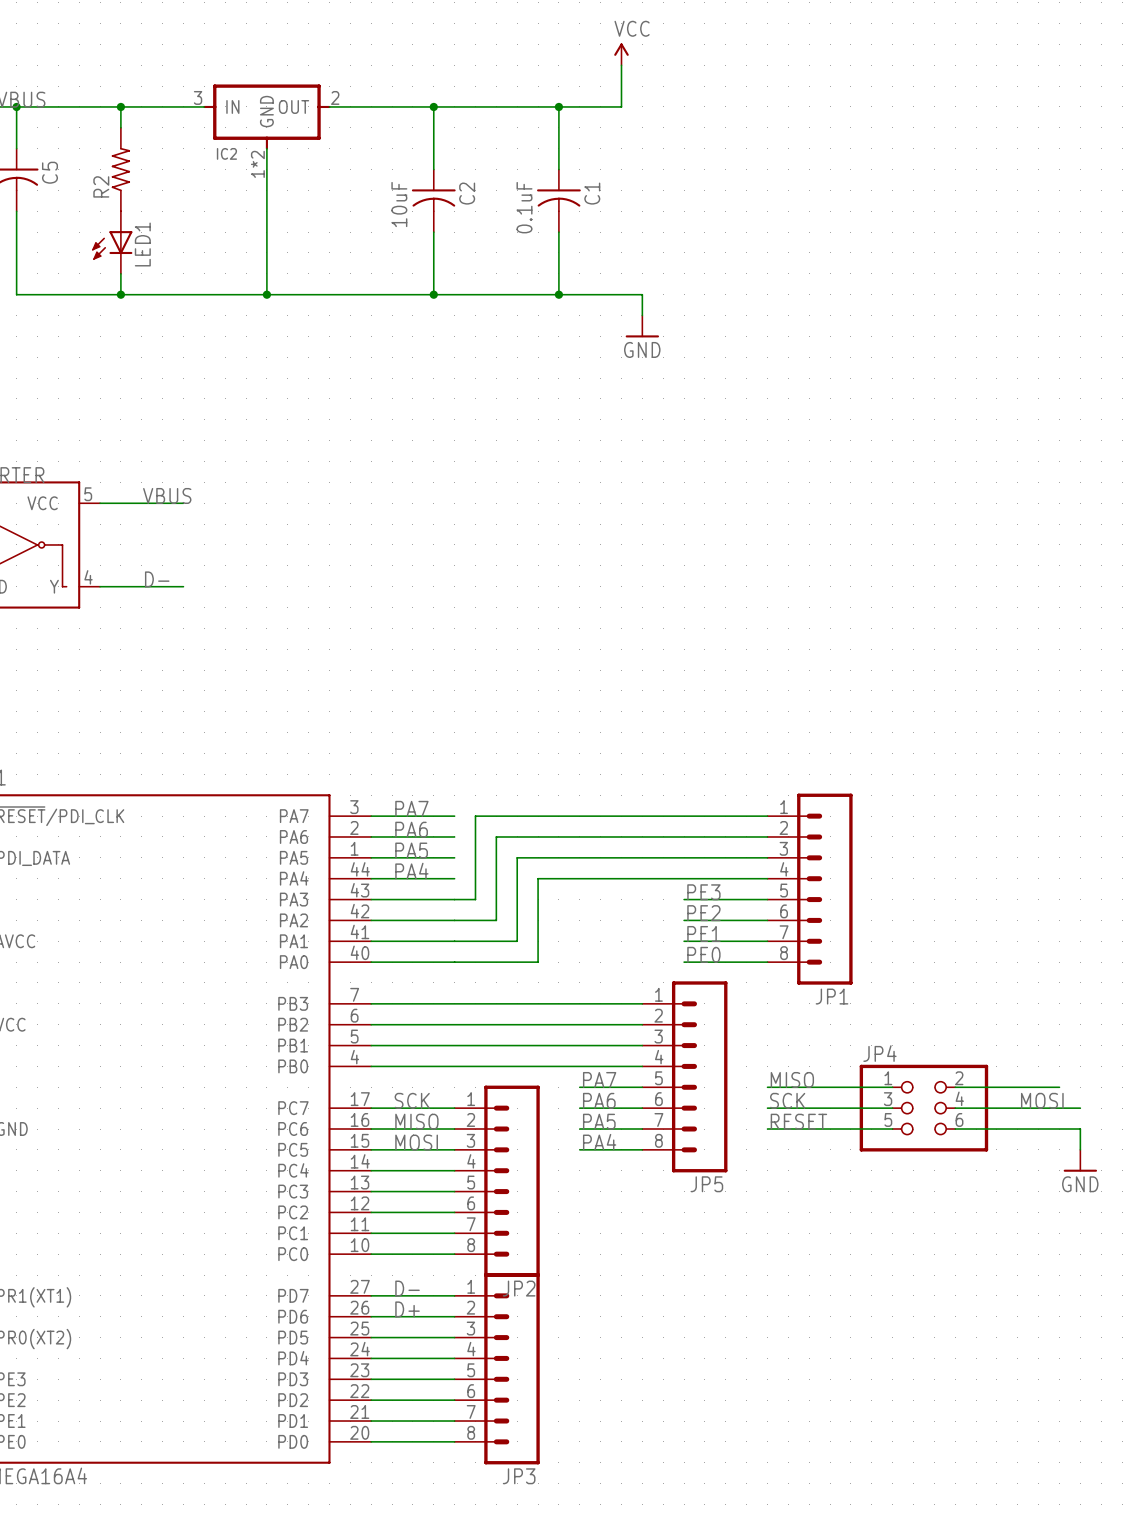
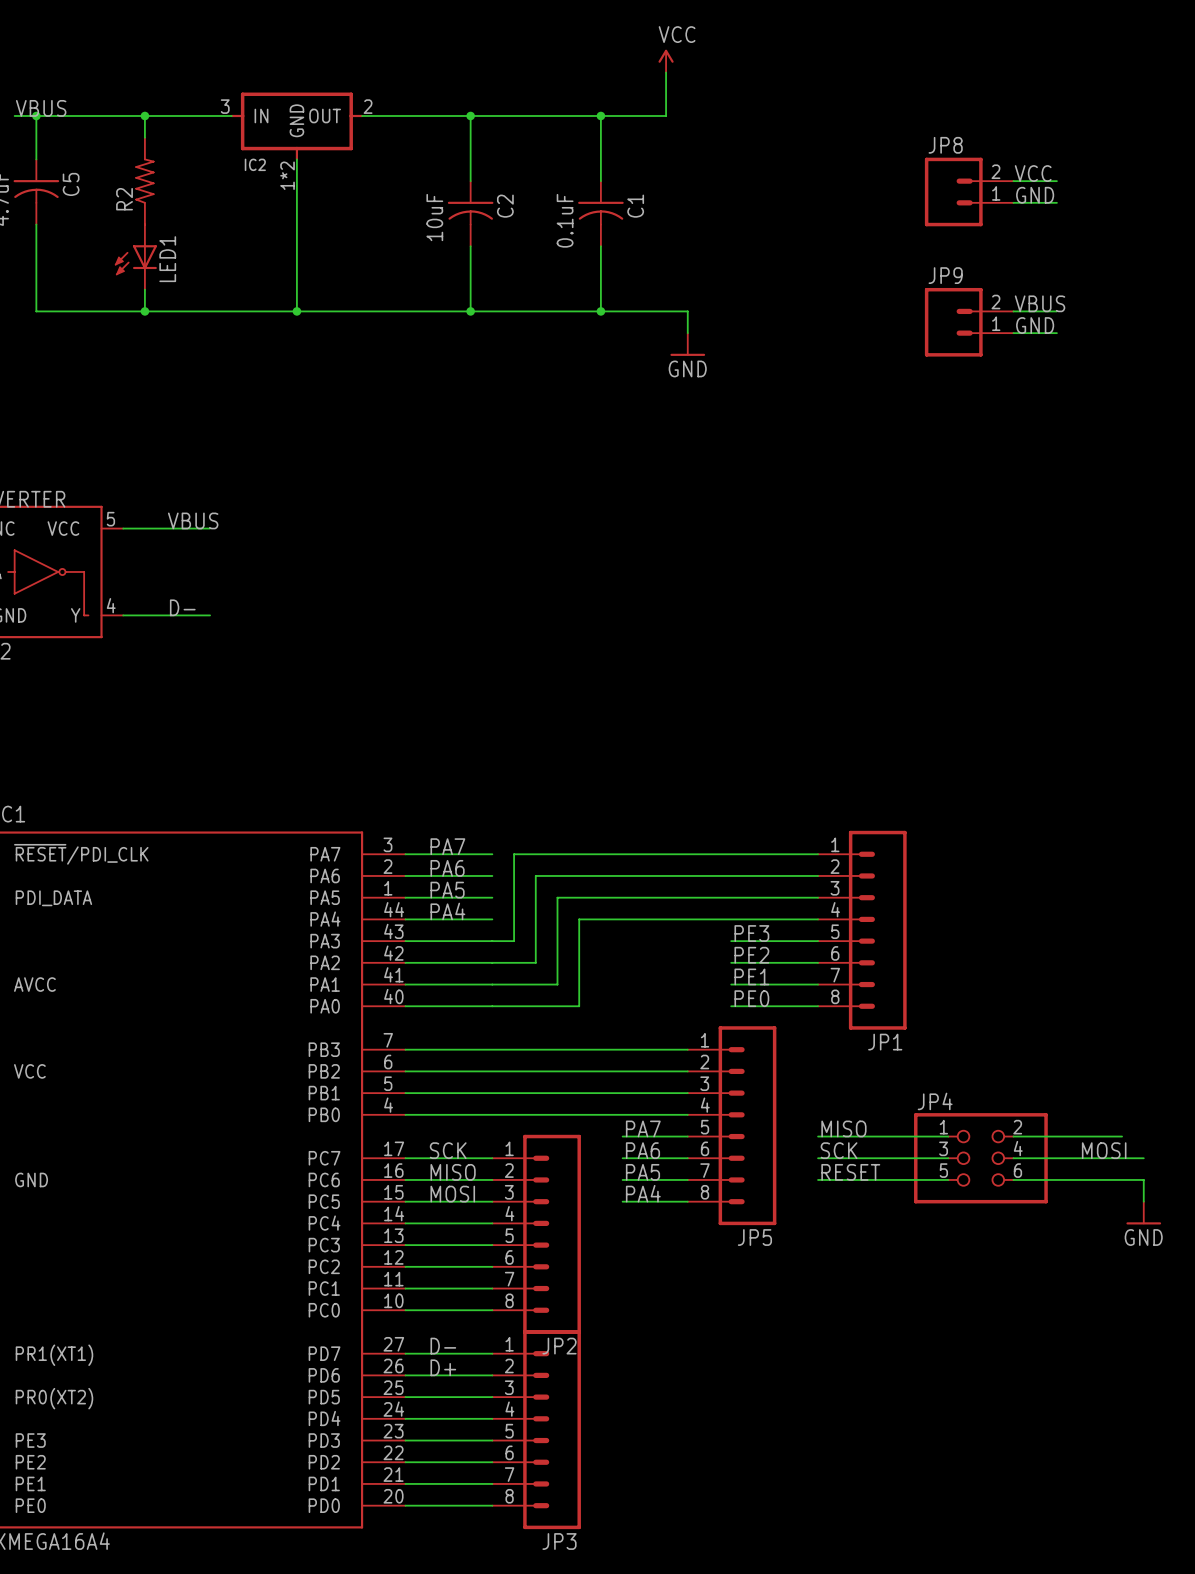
label: none -> VCC (1033, 173)
wire: none -> (1013, 181) (1056, 181)
JP8: none -> (969, 191)
label: none -> GND (1035, 195)
wire: none -> (1013, 202) (1056, 202)
label: none -> VBUS (1040, 303)
wire: none -> (1013, 311) (1056, 311)
JP9: none -> (969, 322)
label: none -> GND (1035, 325)
wire: none -> (1013, 333) (1056, 333)

